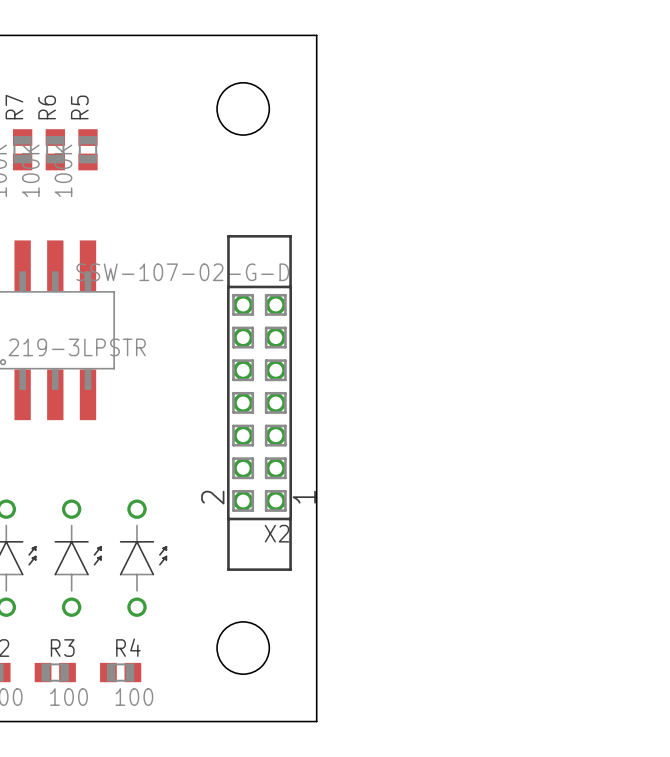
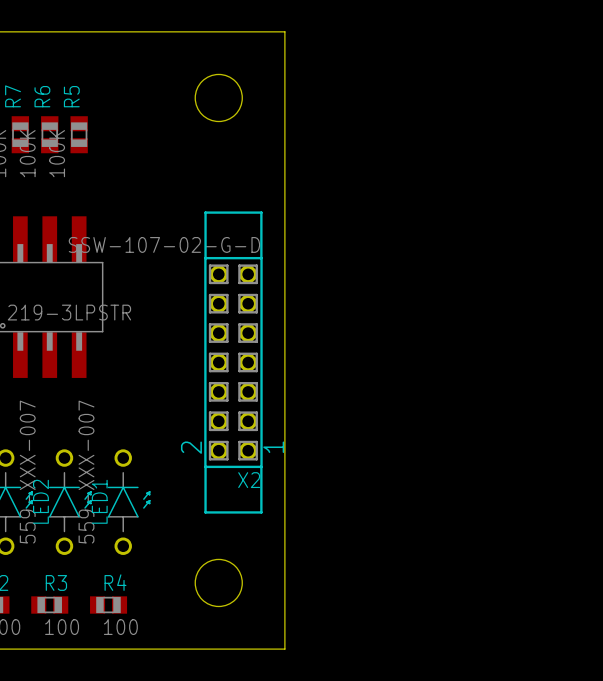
LED2 value: none -> 559-XXX-007 (27, 472)
LED1 value: none -> 559-XXX-007 (86, 472)
LED2 name: none -> LED2 (40, 501)
LED1 name: none -> LED1 (99, 501)

